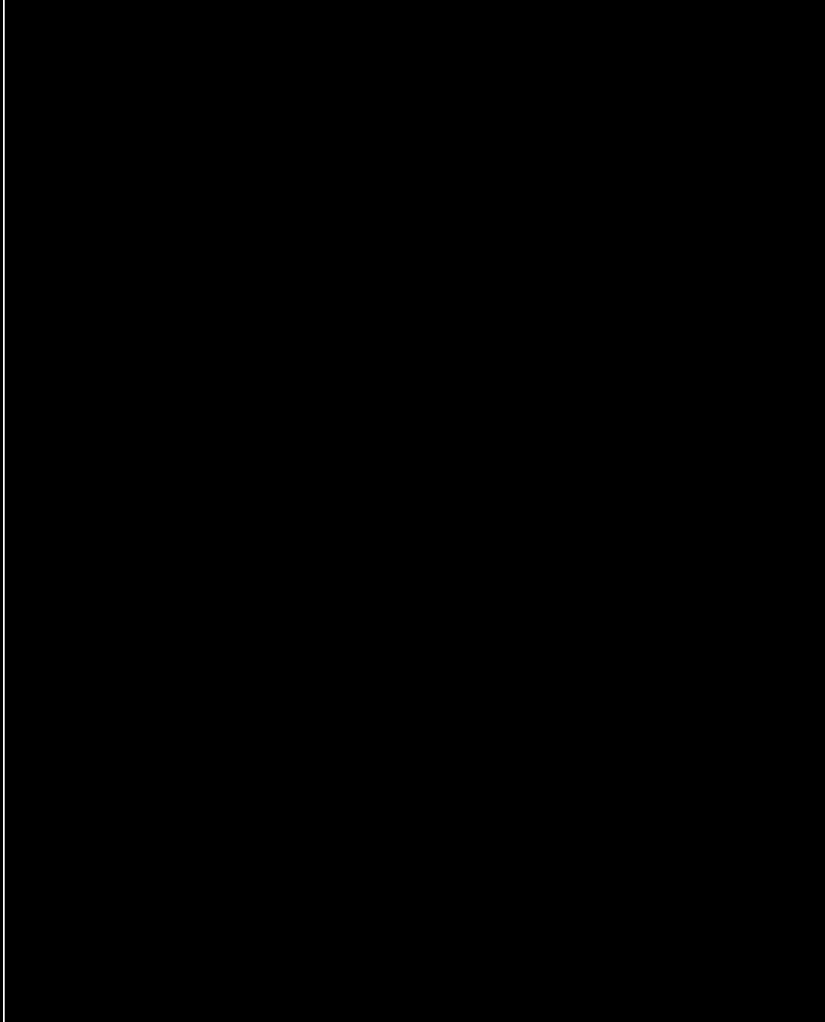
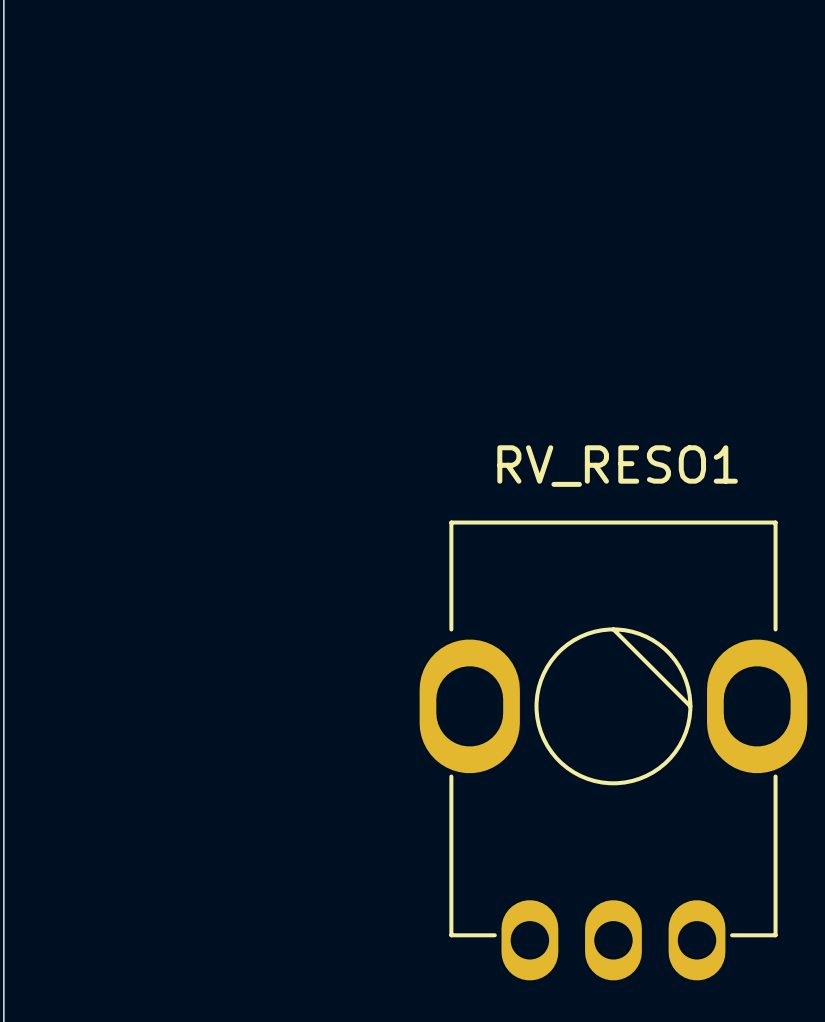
RV_RESO1: none -> (613, 750)

